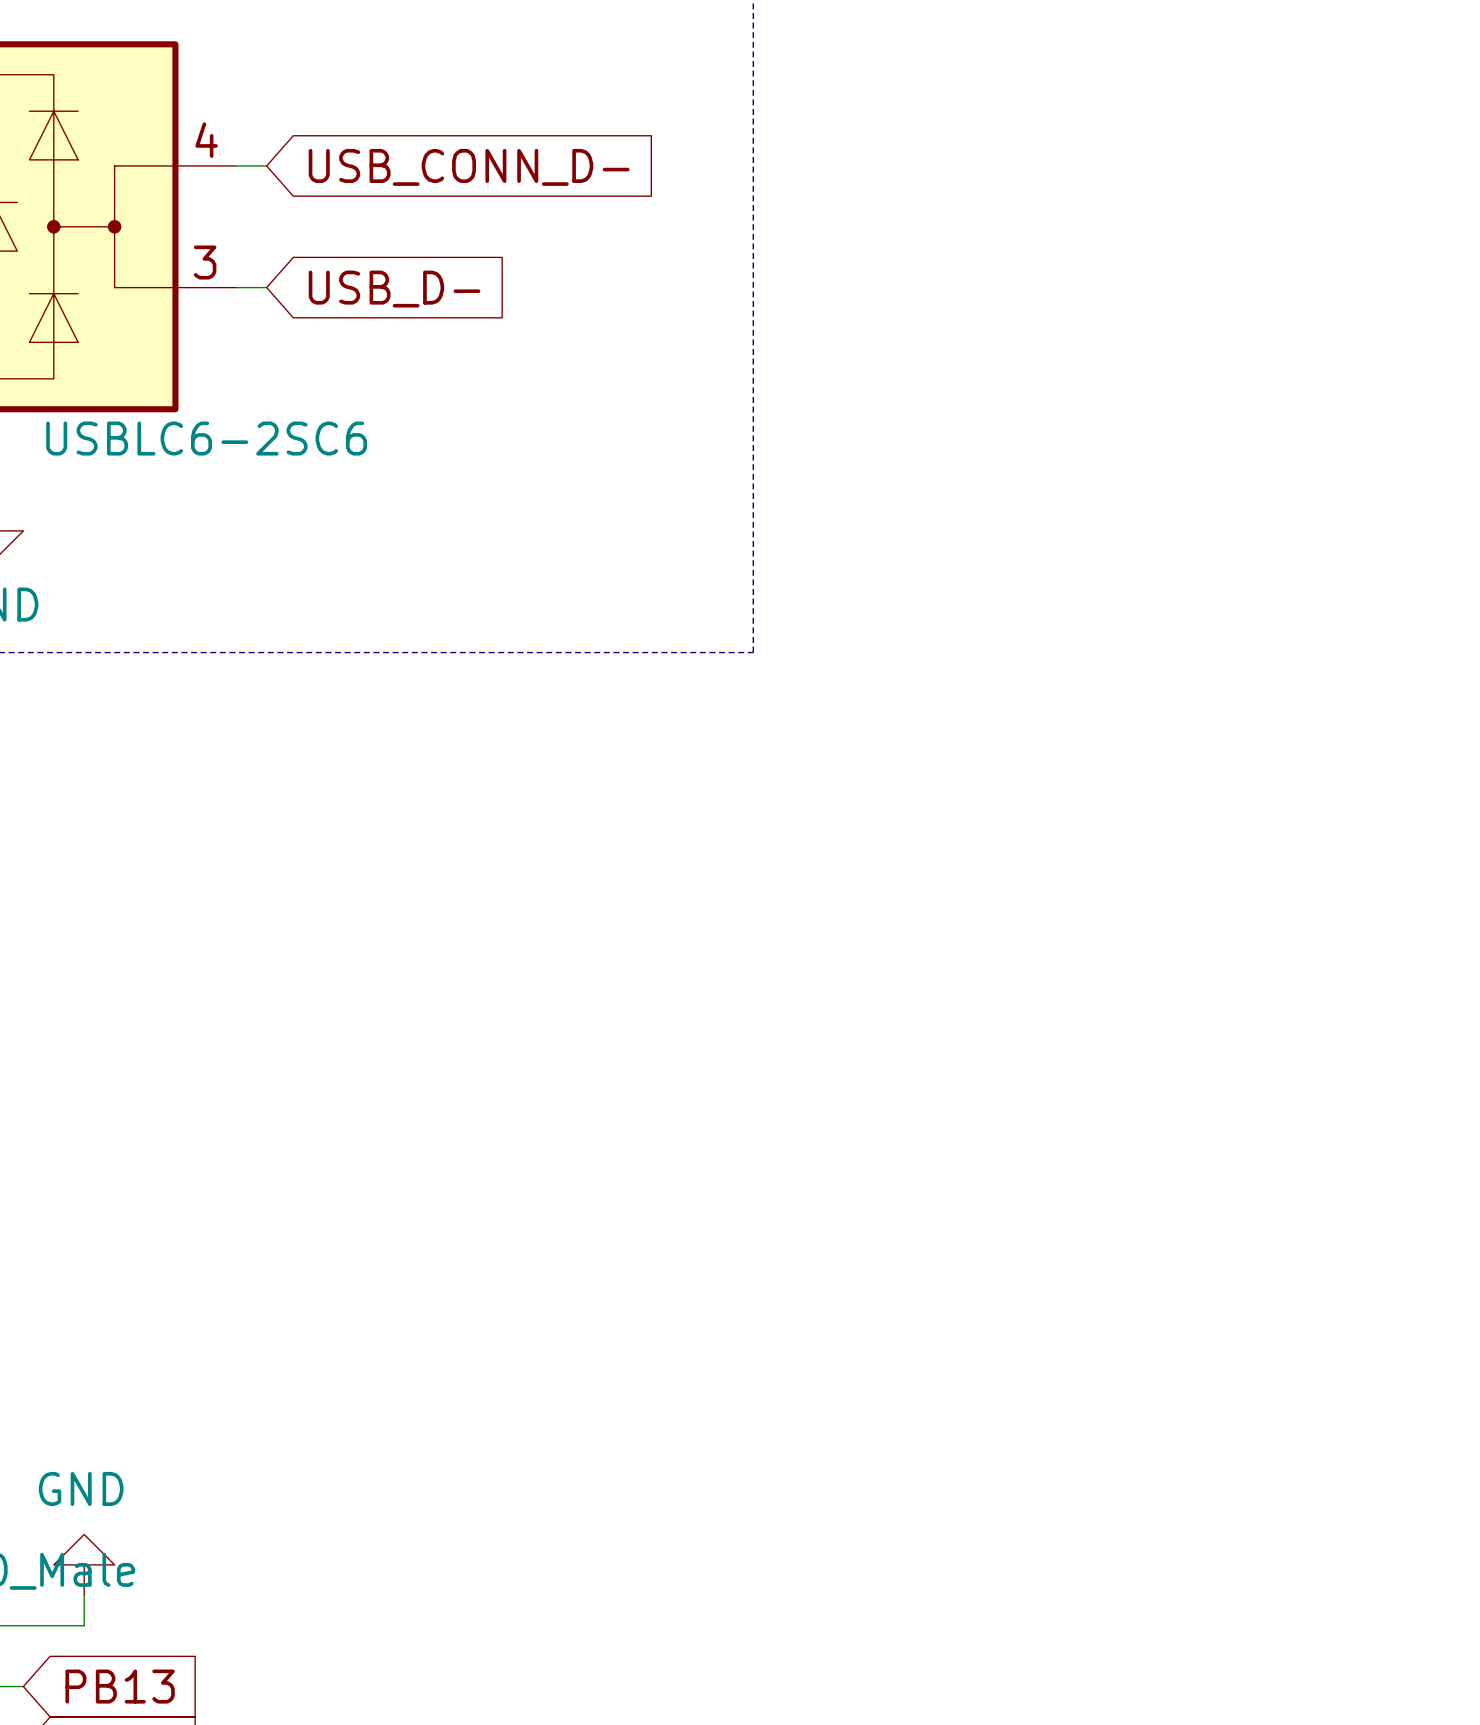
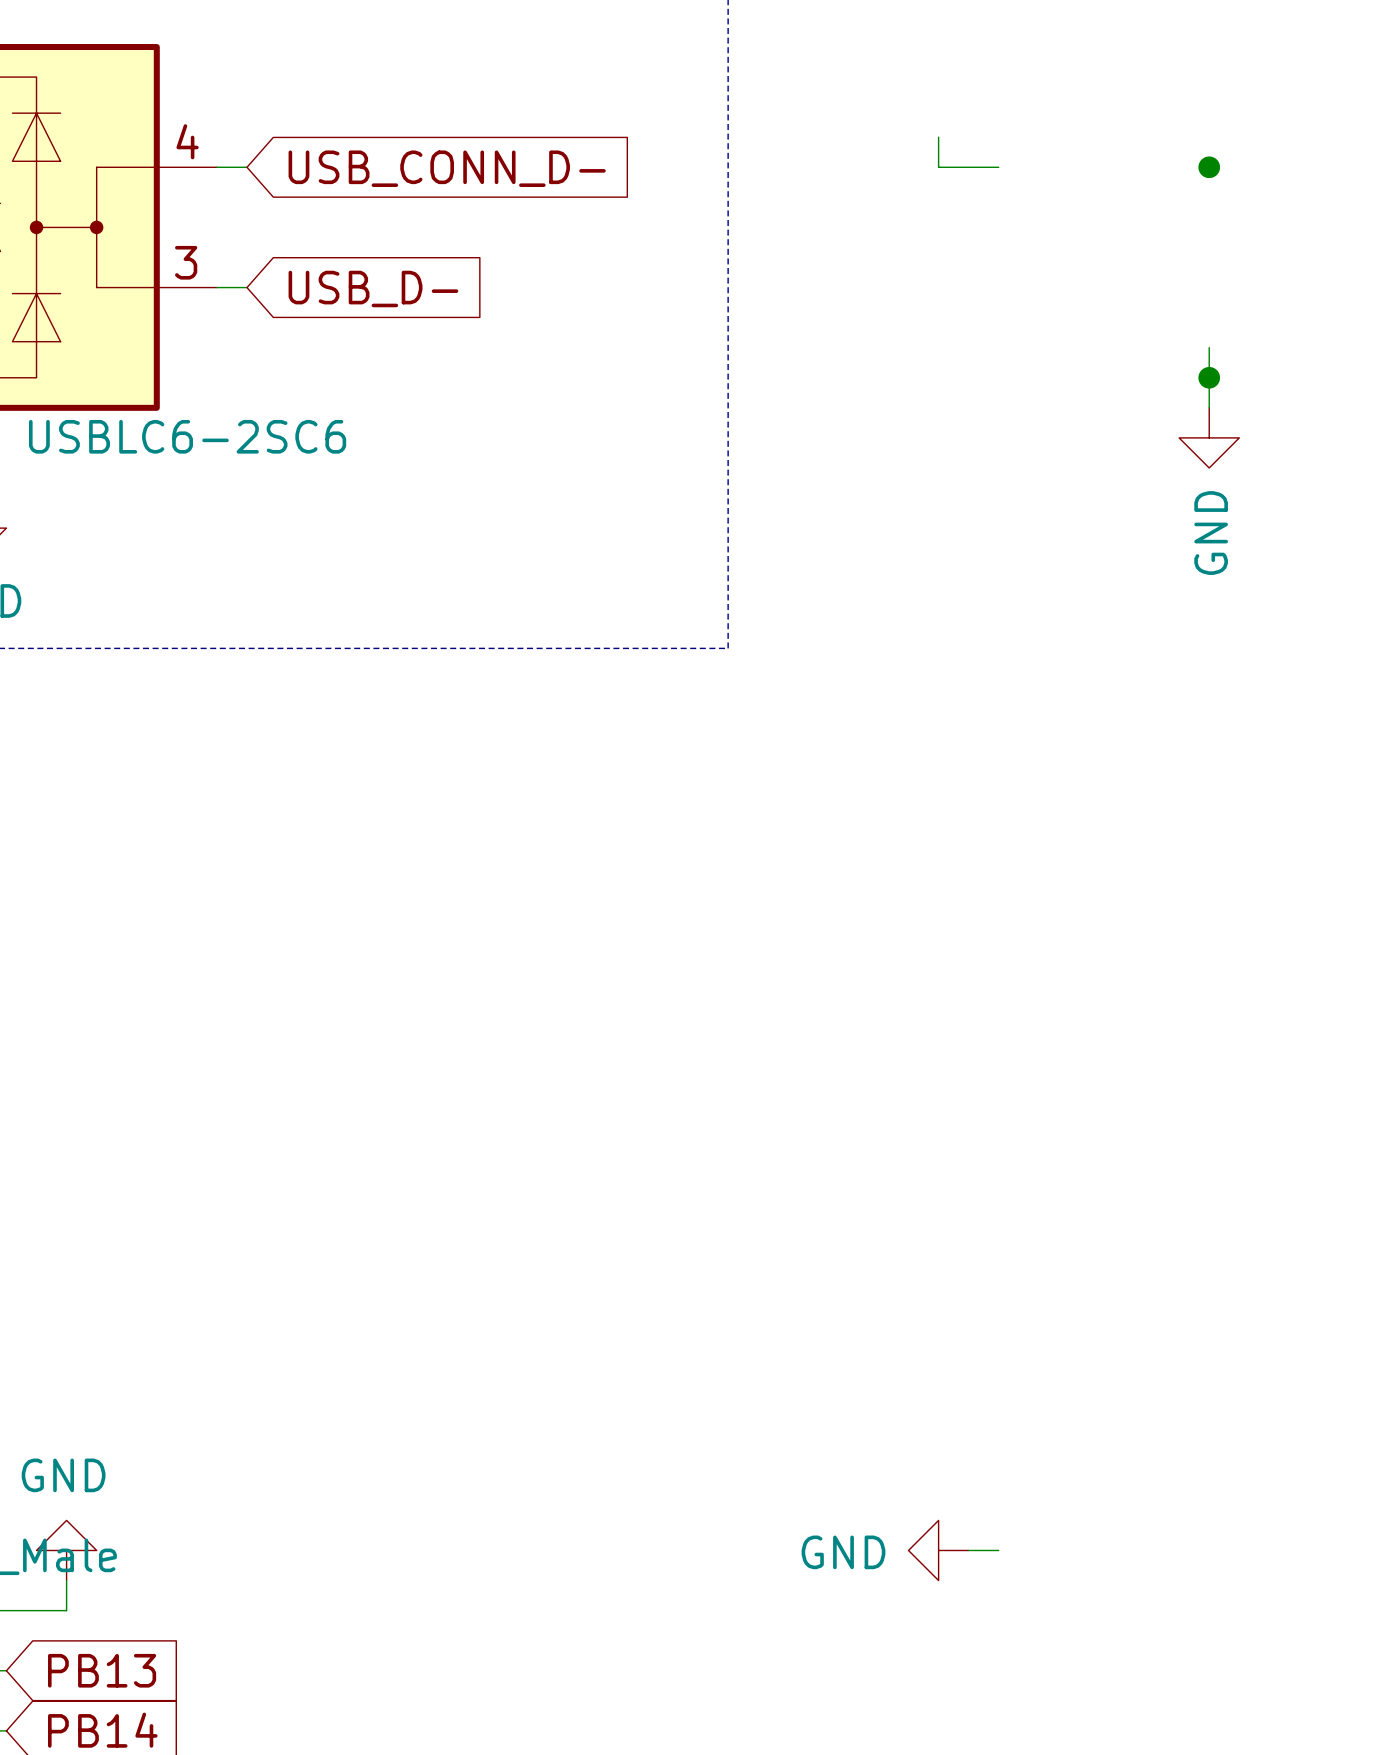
wire: none -> (938, 137) (938, 167) (998, 167)
junction: none -> (1209, 167)
wire: none -> (1209, 347) (1209, 407)
junction: none -> (1209, 377)
power symbol: none -> GND (1209, 437)
power symbol: none -> GND (938, 1550)
wire: none -> (968, 1550) (998, 1550)

